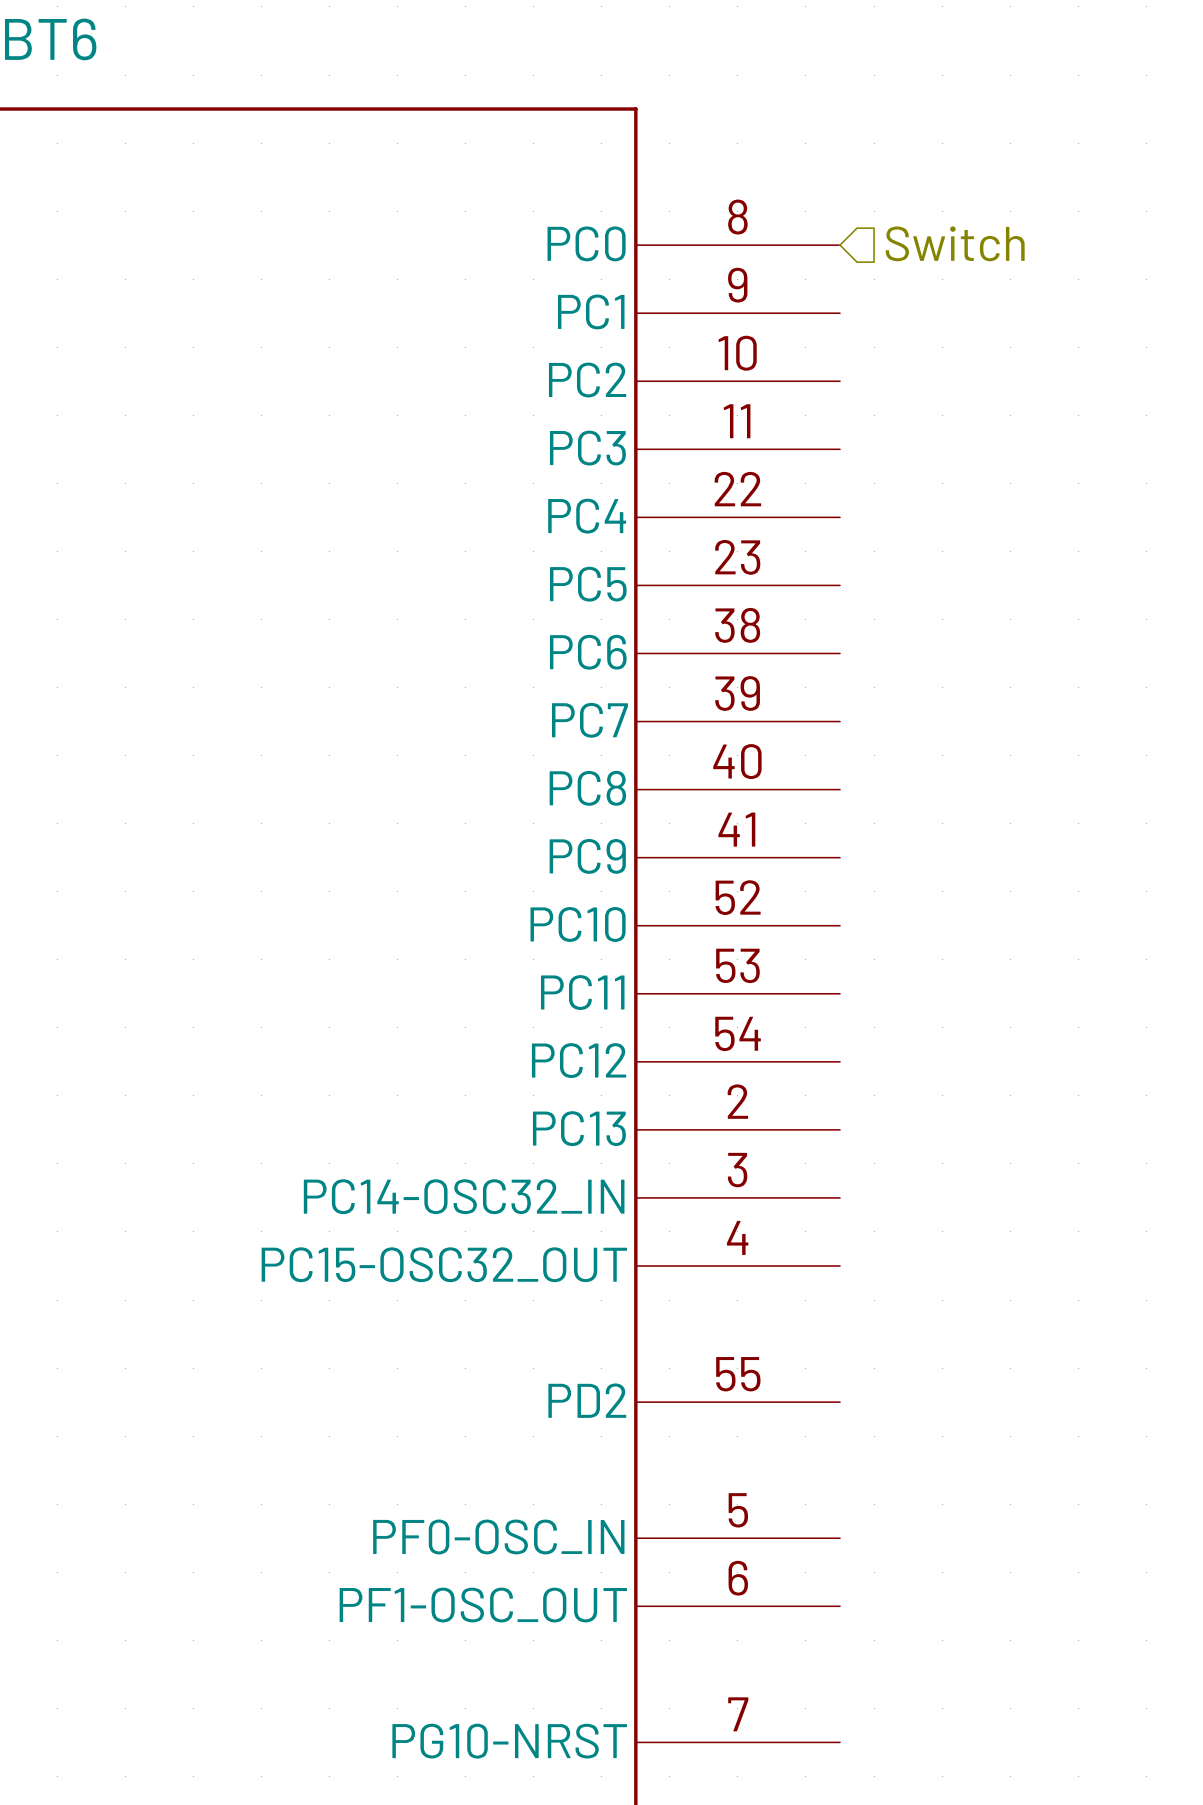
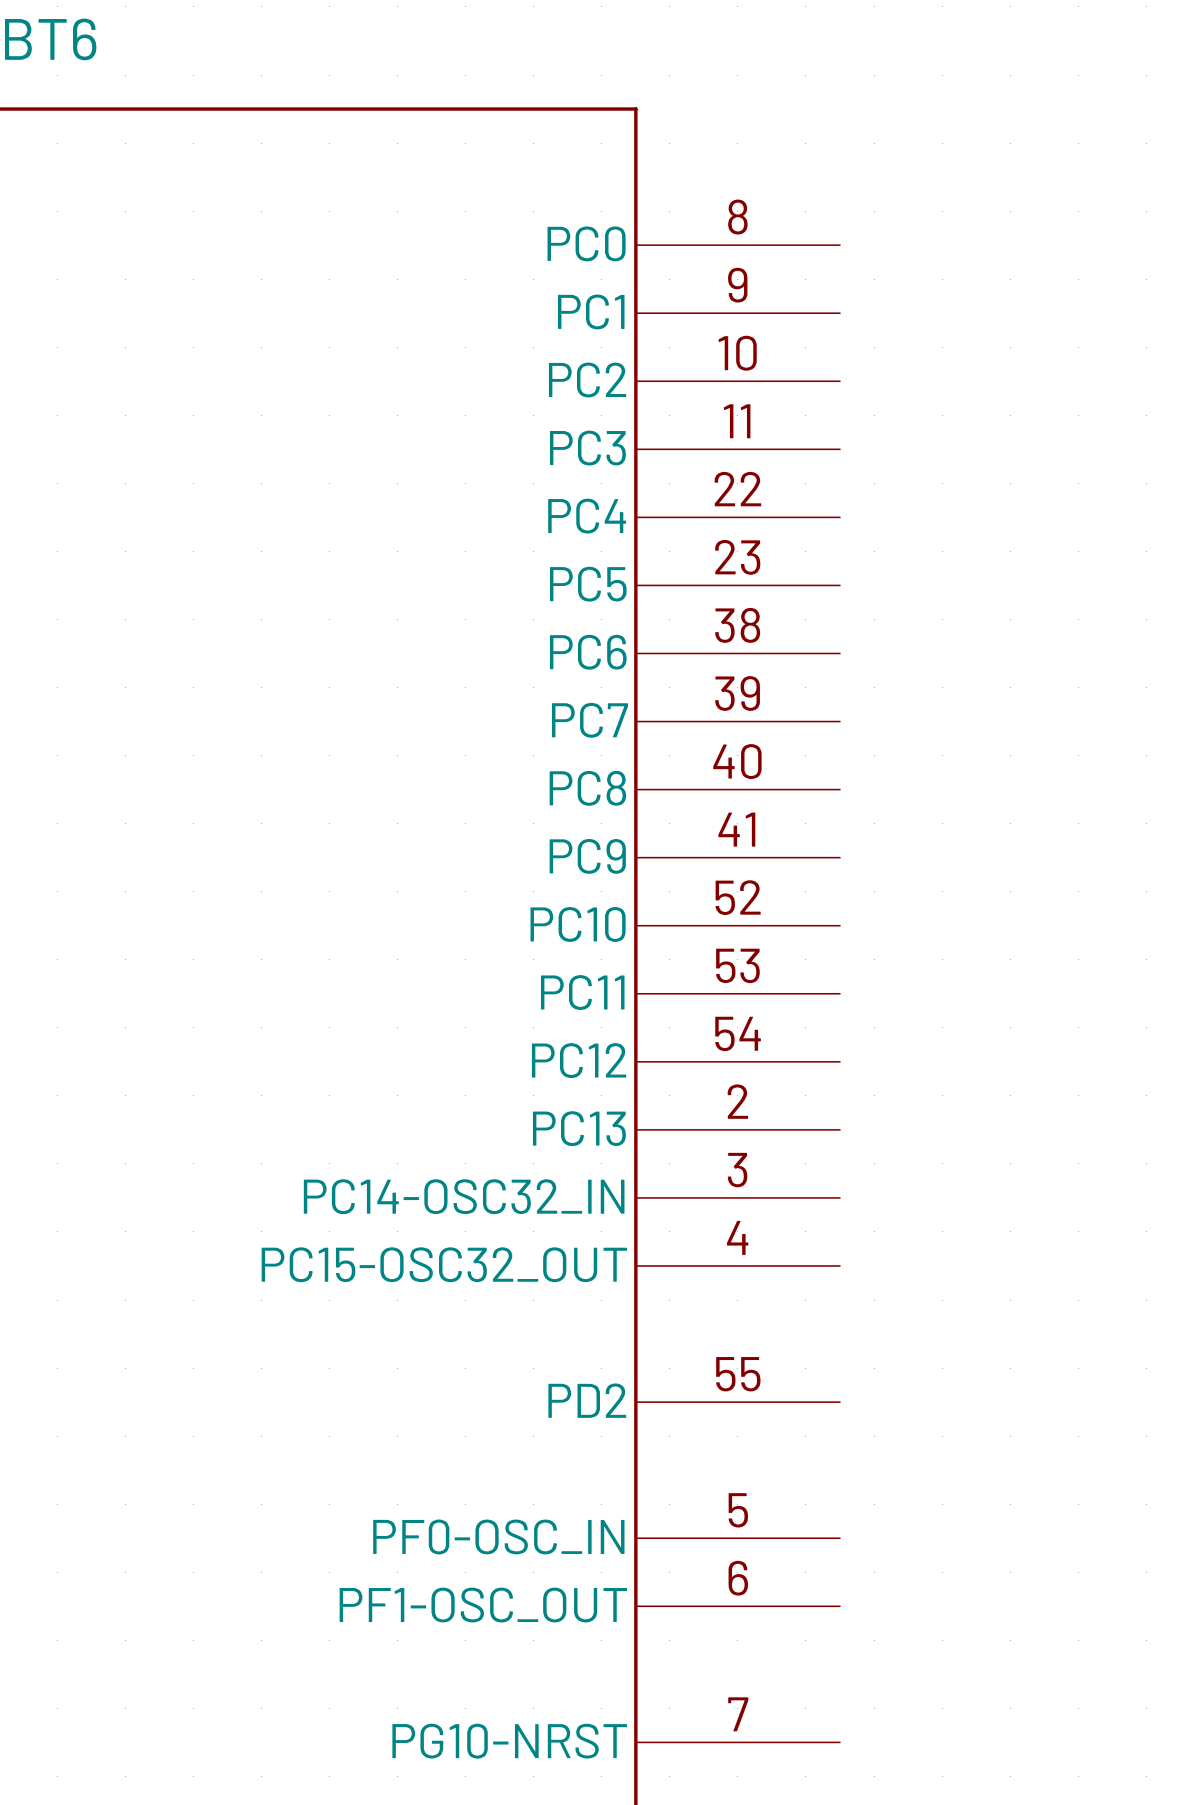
hierarchical label: Switch (955, 243) -> none

